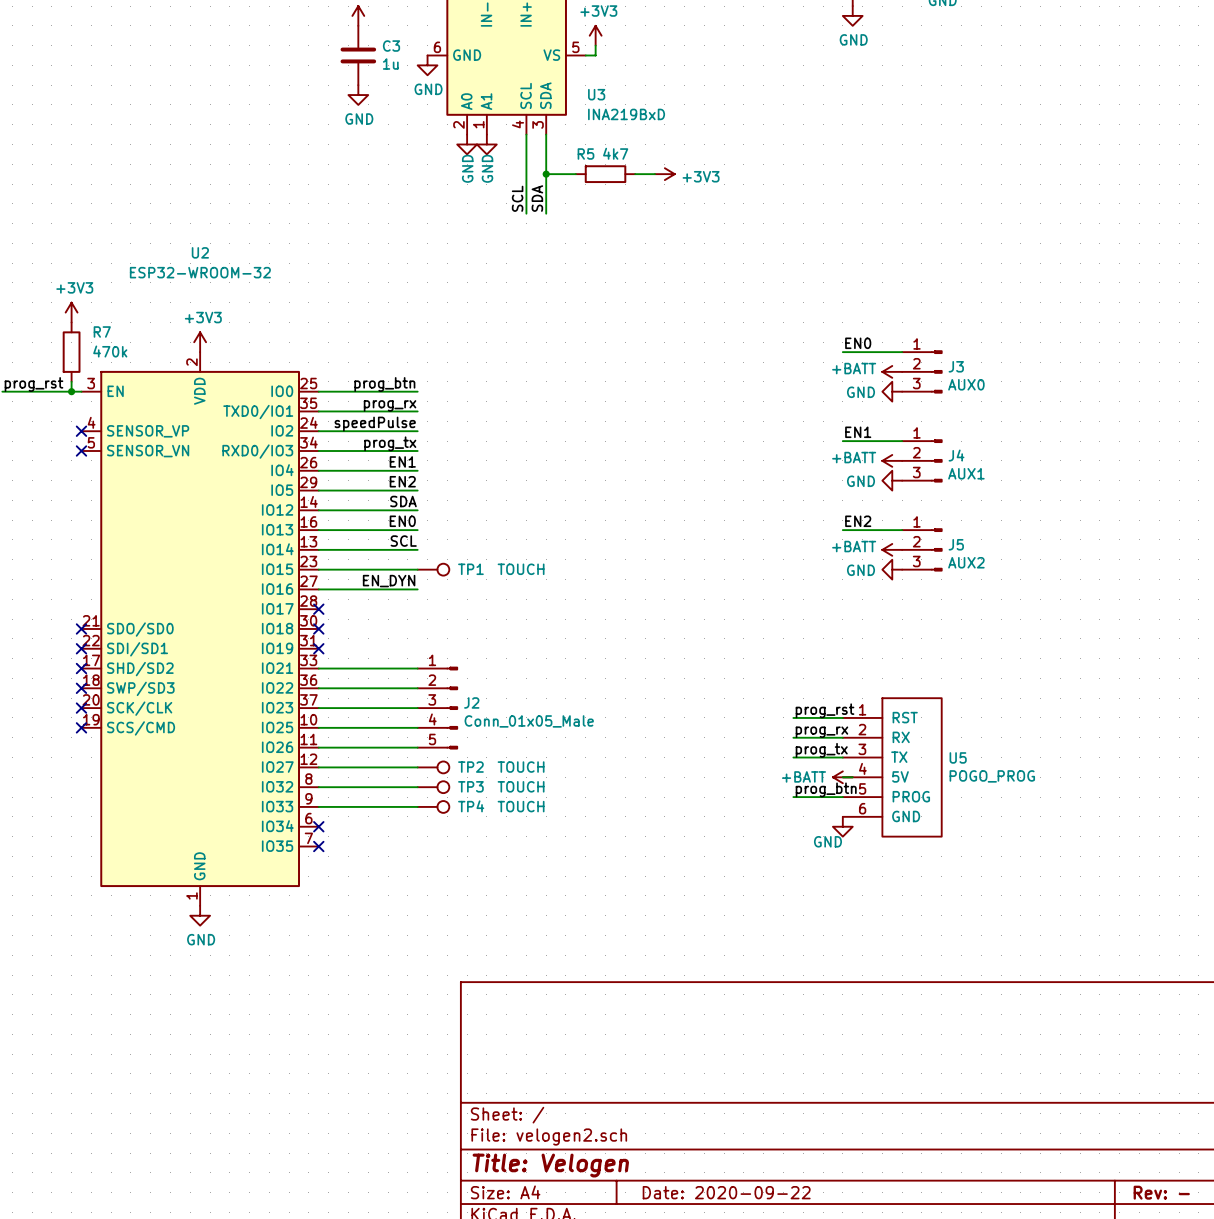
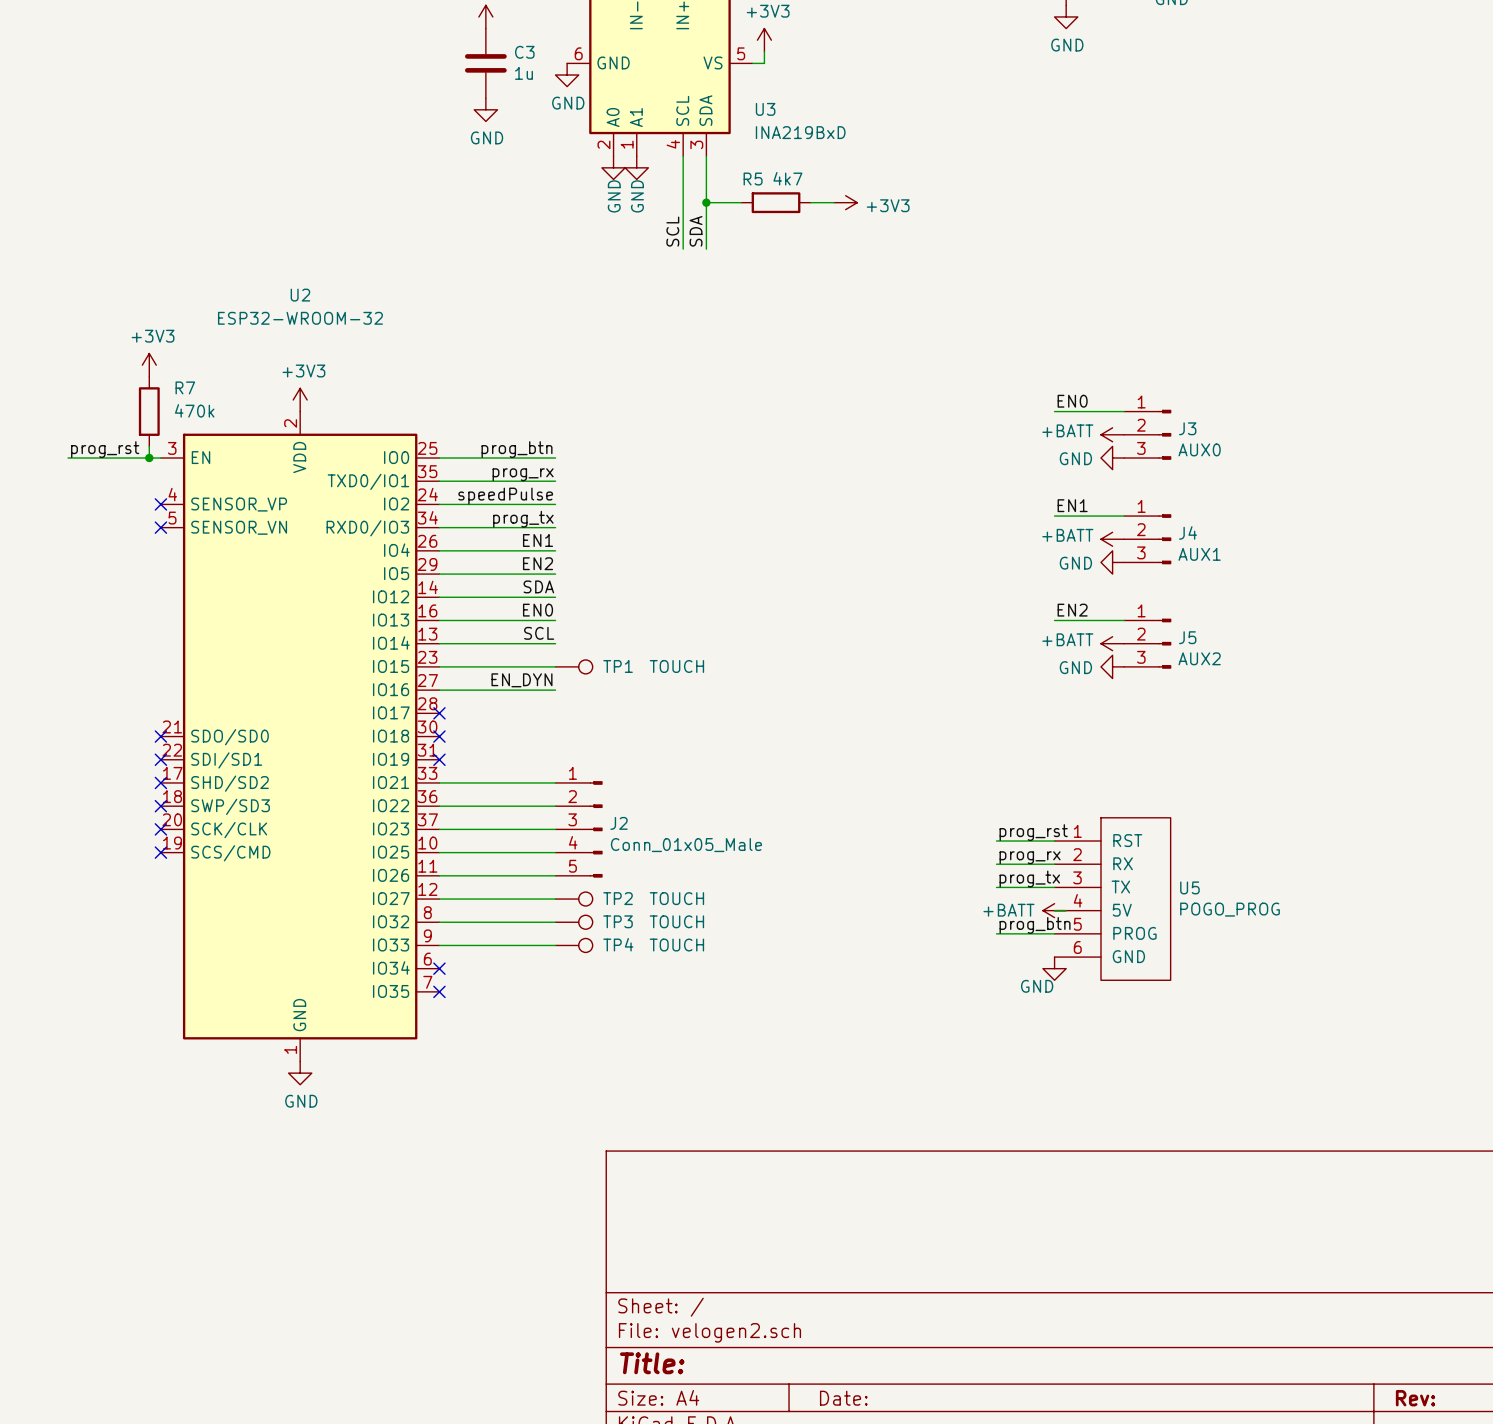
title block: Title: Velogen (550, 1165) -> Title: (652, 1363)
title block: Date: 2020-09-22 (726, 1192) -> Date: (843, 1398)
title block: Rev: - (1161, 1192) -> Rev: (1415, 1398)

